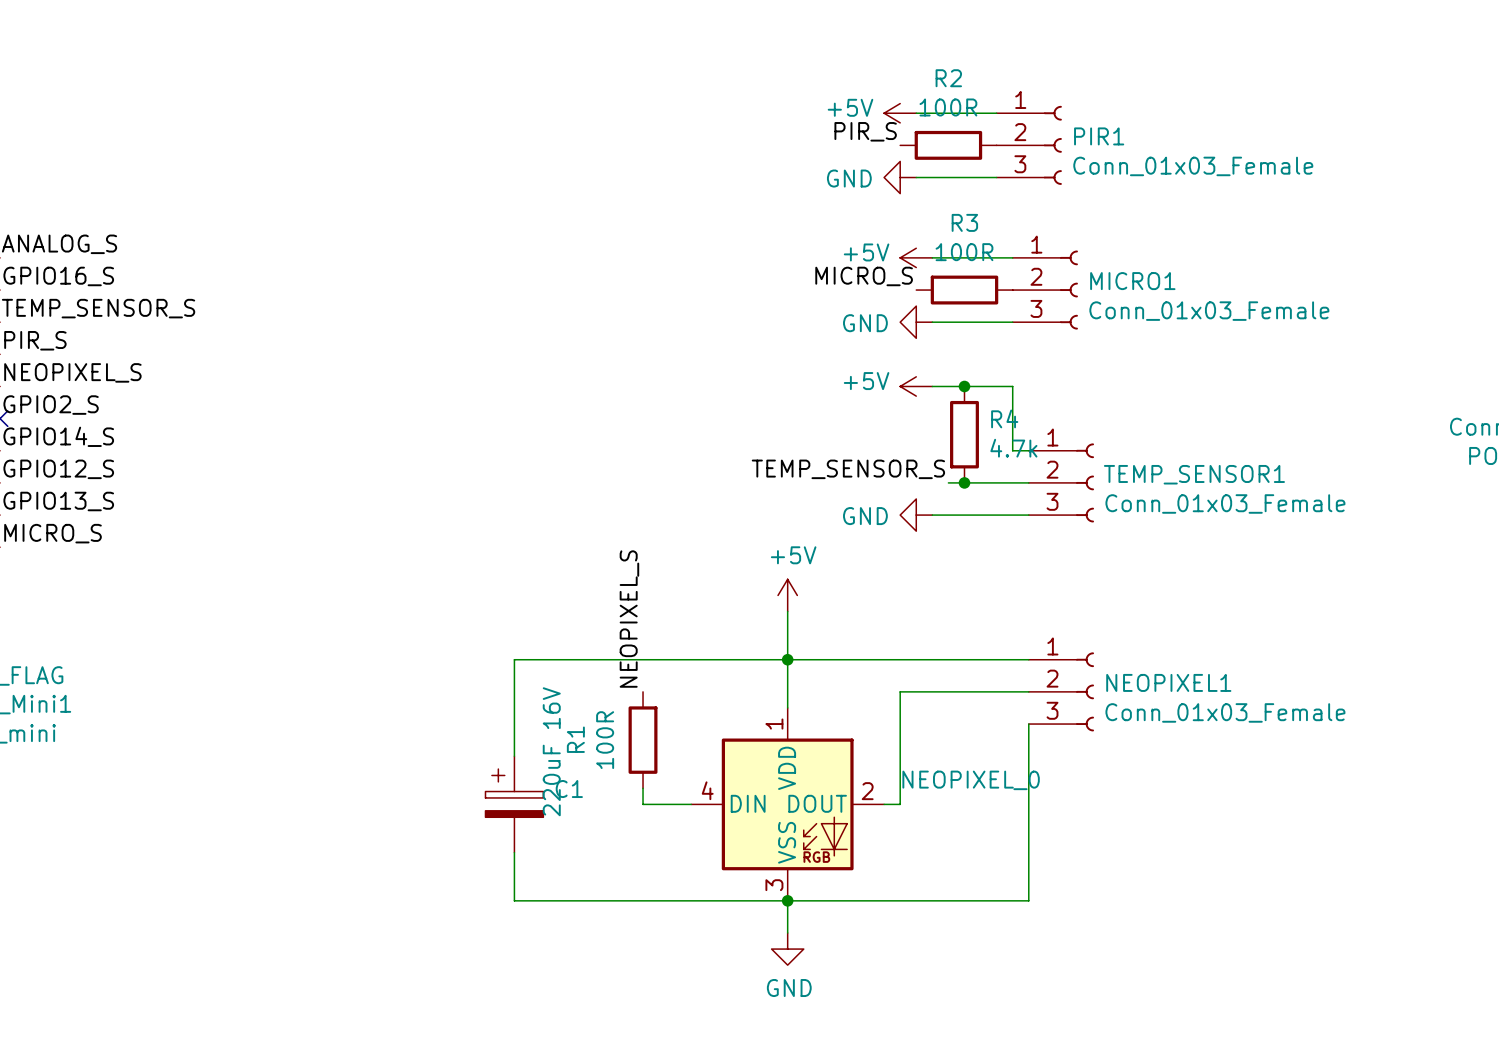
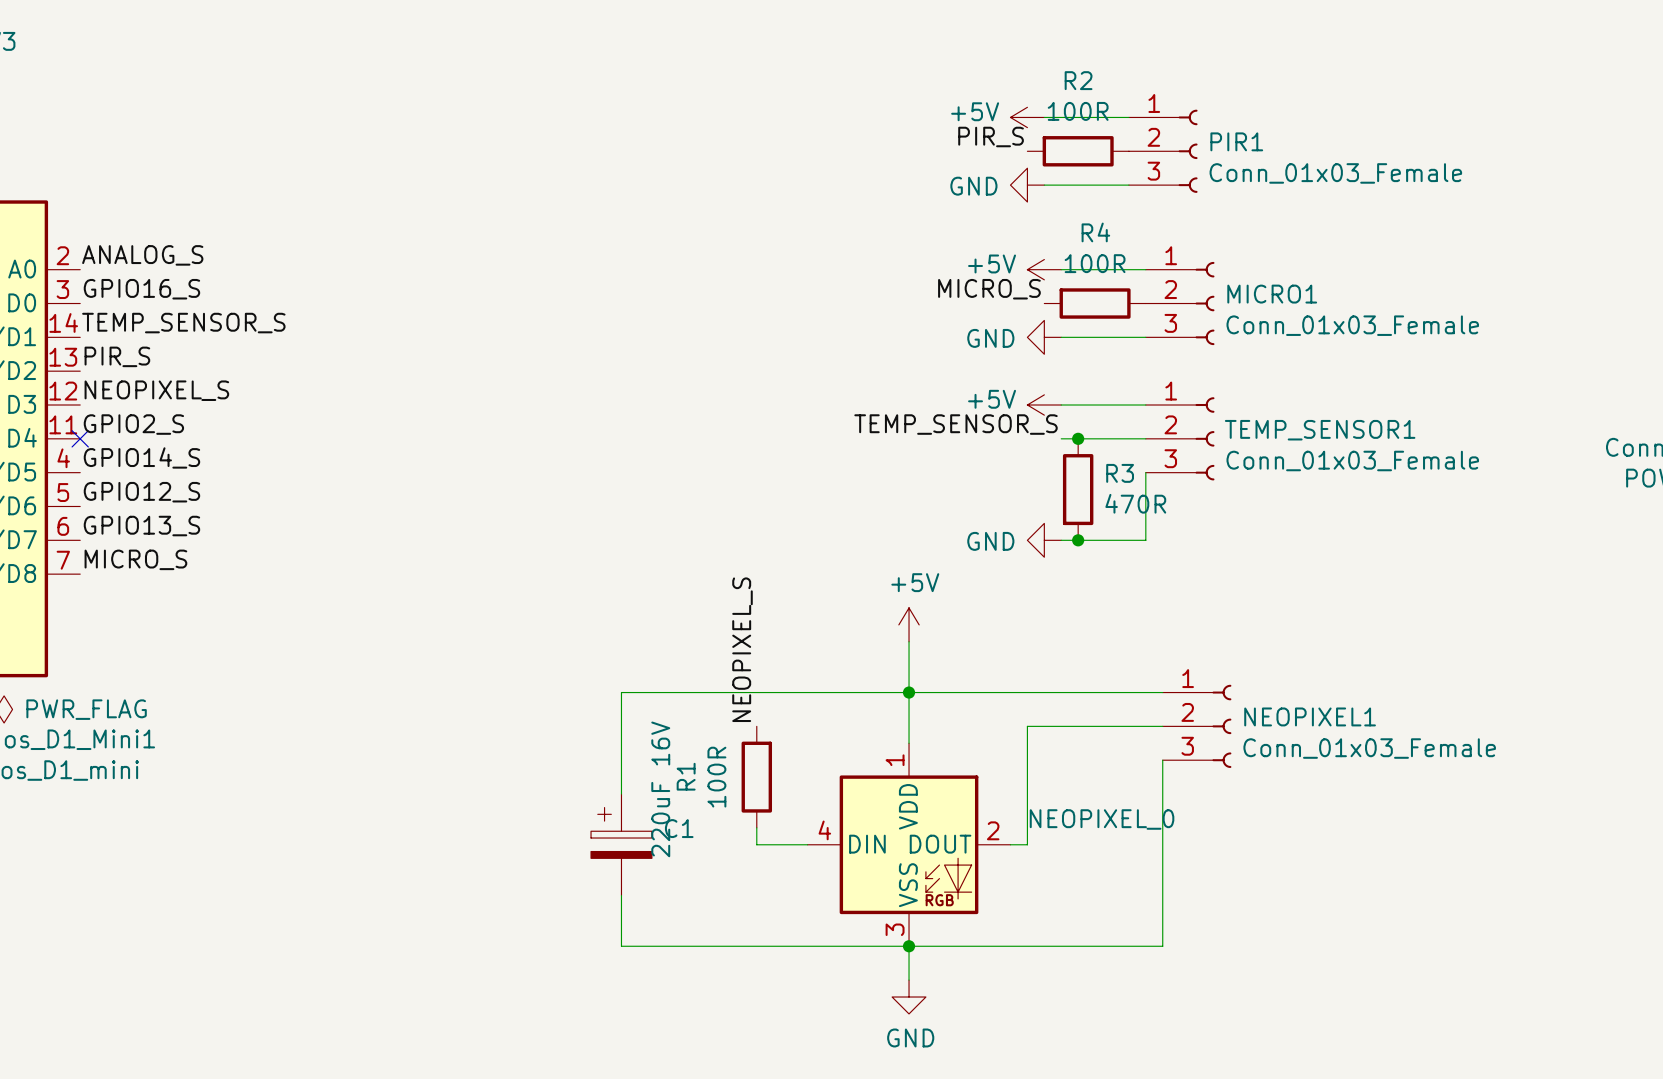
R3 name: R3 (964, 222) -> R4 (1095, 232)
junction: (964, 386) -> none
wire: (1012, 386) (1012, 450) (1028, 450) -> none
junction: none -> (1078, 438)
R4: 4.7k (964, 434) -> none
R3: none -> 470R (1078, 489)
label position: TEMP_SENSOR_S (848, 469) -> TEMP_SENSOR_S (956, 424)
wire: (948, 482) (1028, 482) -> (1061, 438) (1145, 438)
junction: (964, 482) -> none
TEMP_SENSOR1 position: (1061, 482) -> (1180, 438)
junction: none -> (1078, 540)
wire: (1012, 515) (1028, 515) -> (1145, 540) (1145, 472)

